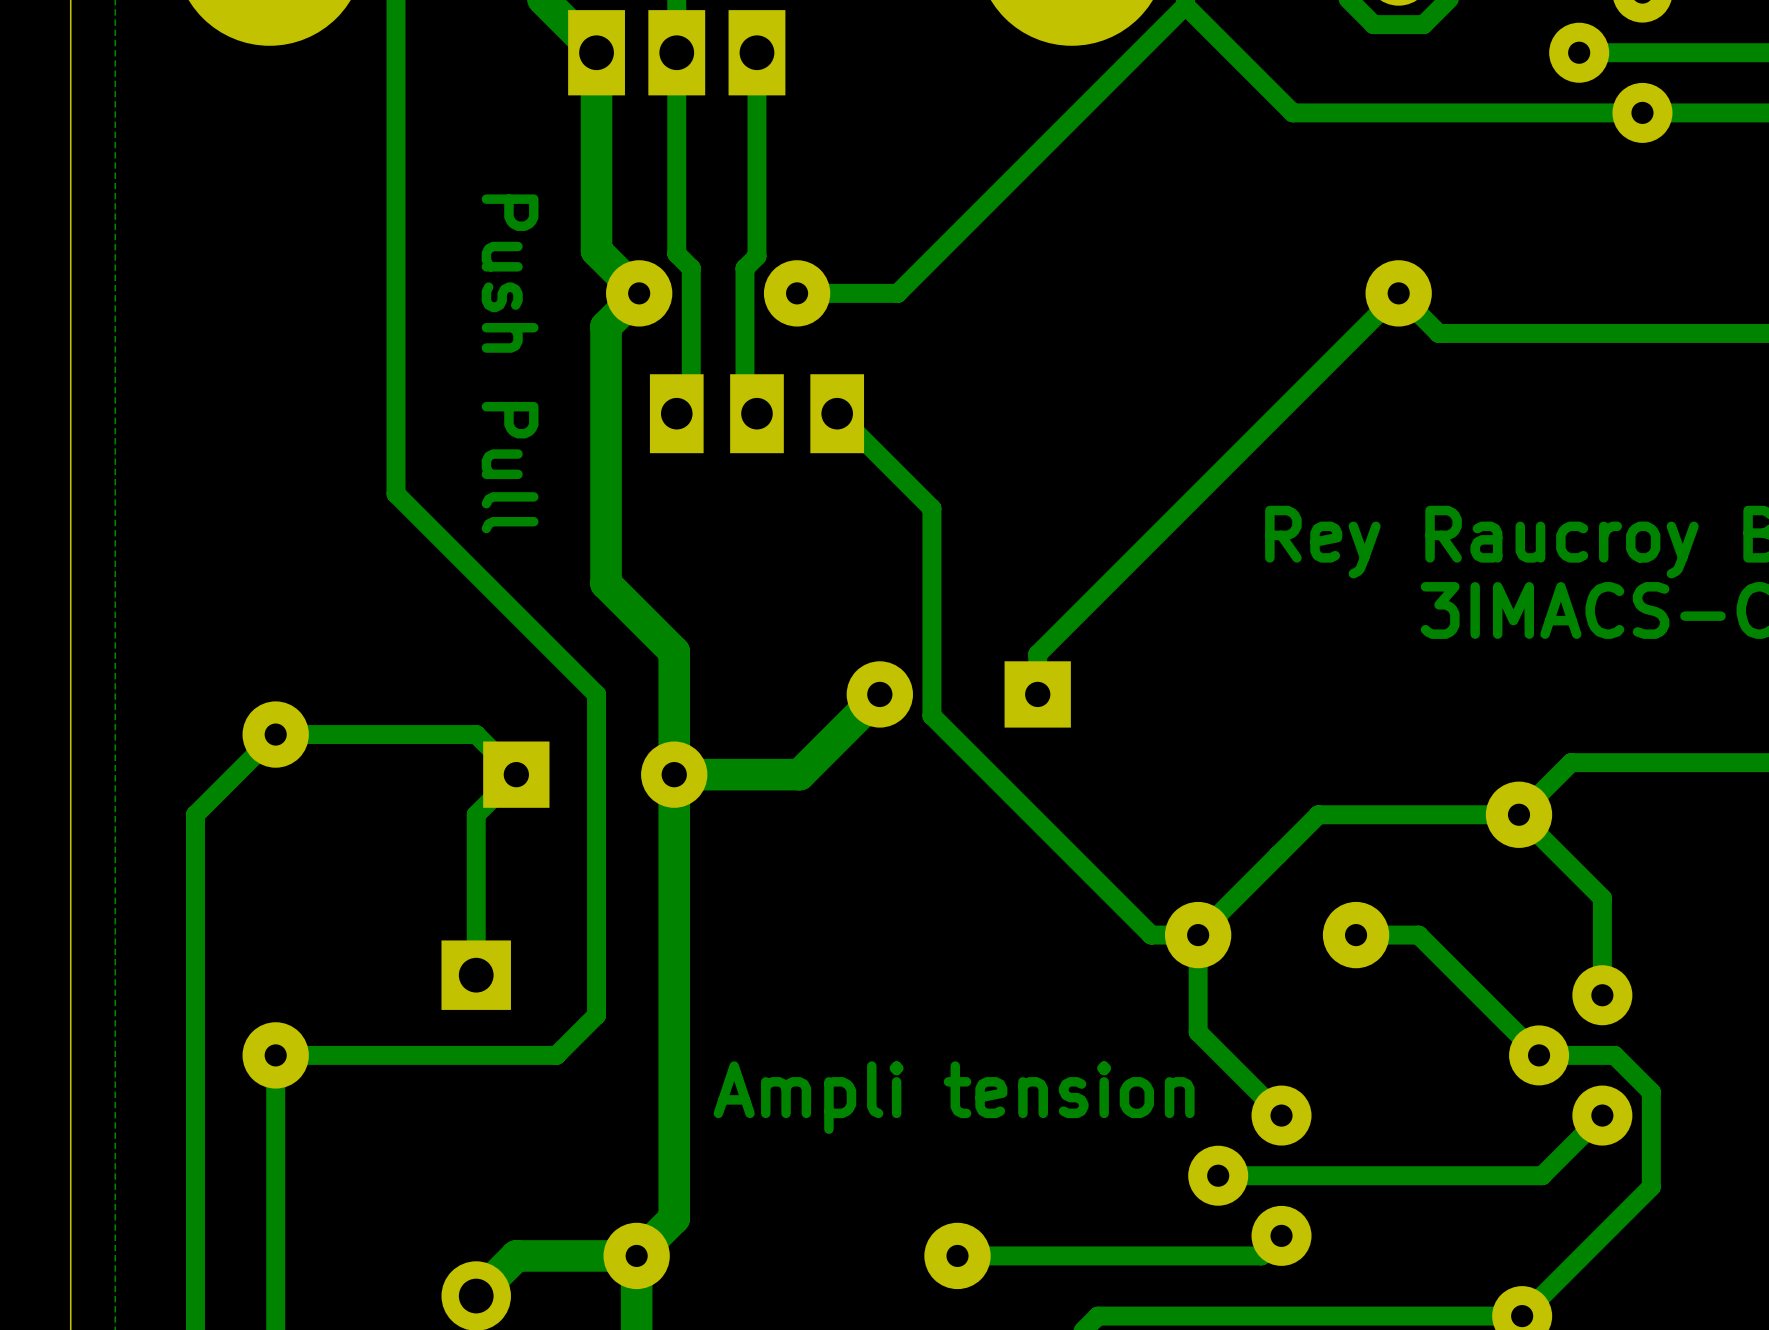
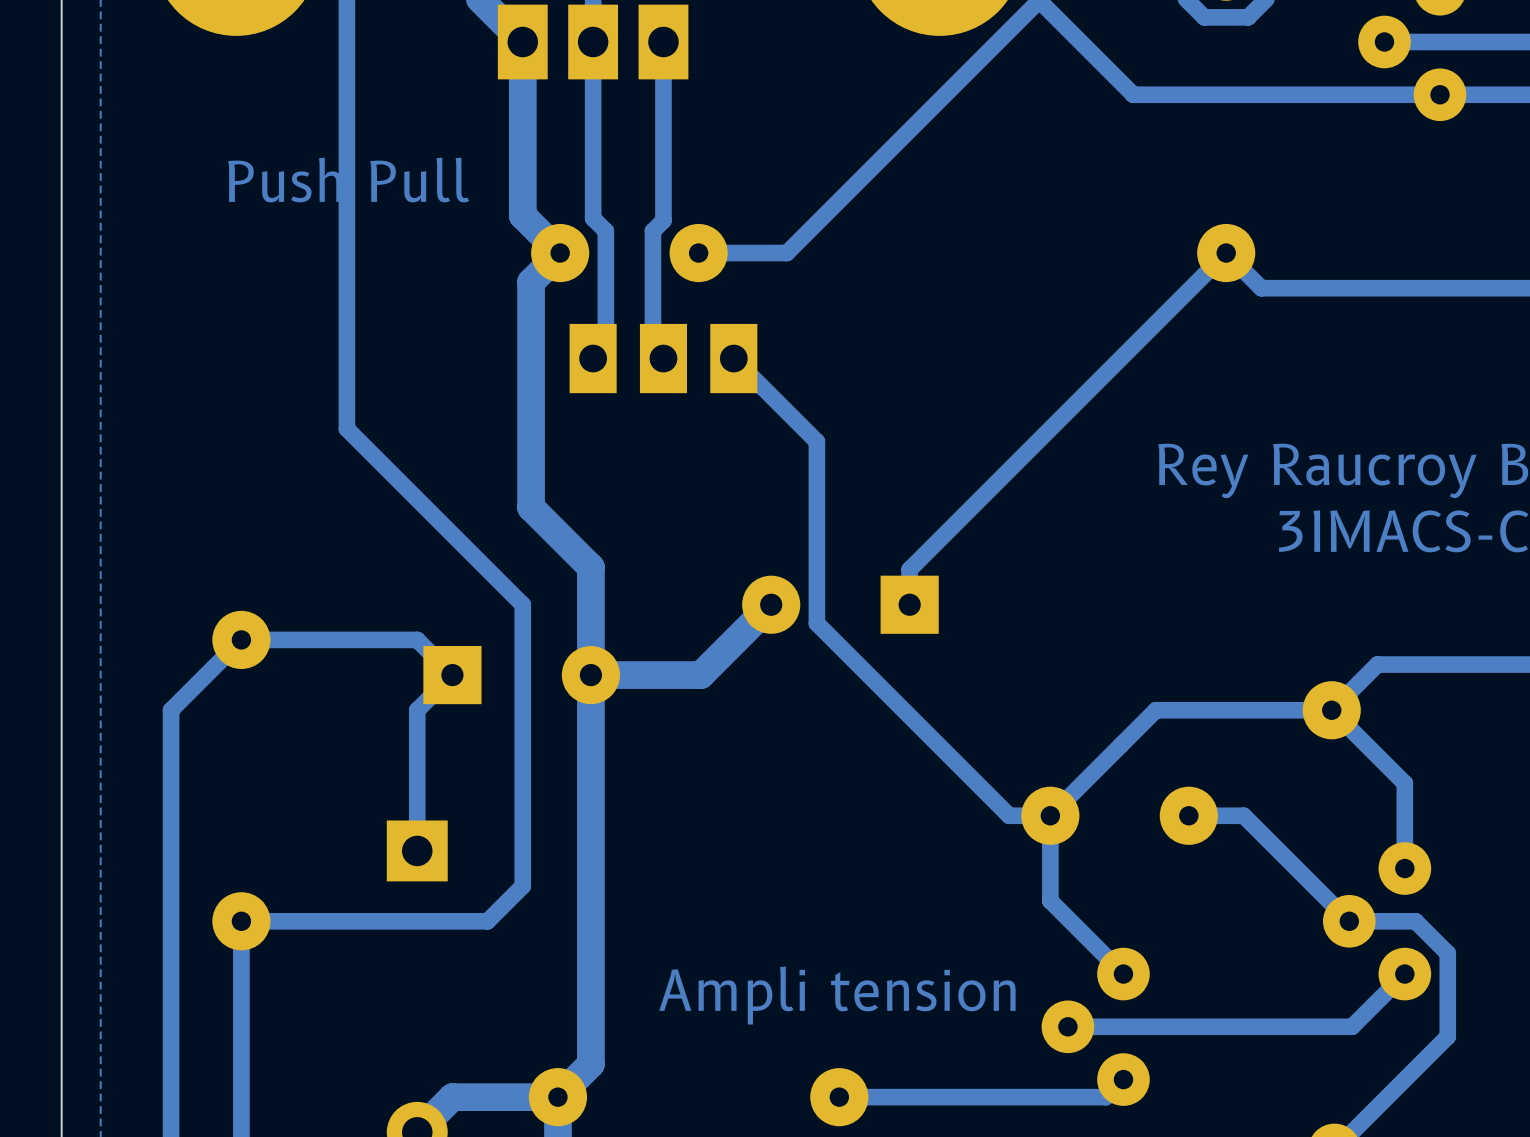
text rotation: 0° (510, 363) -> 90° counterclockwise (348, 179)
text position: Ampli tension (954, 1097) -> Ampli tension (837, 995)

